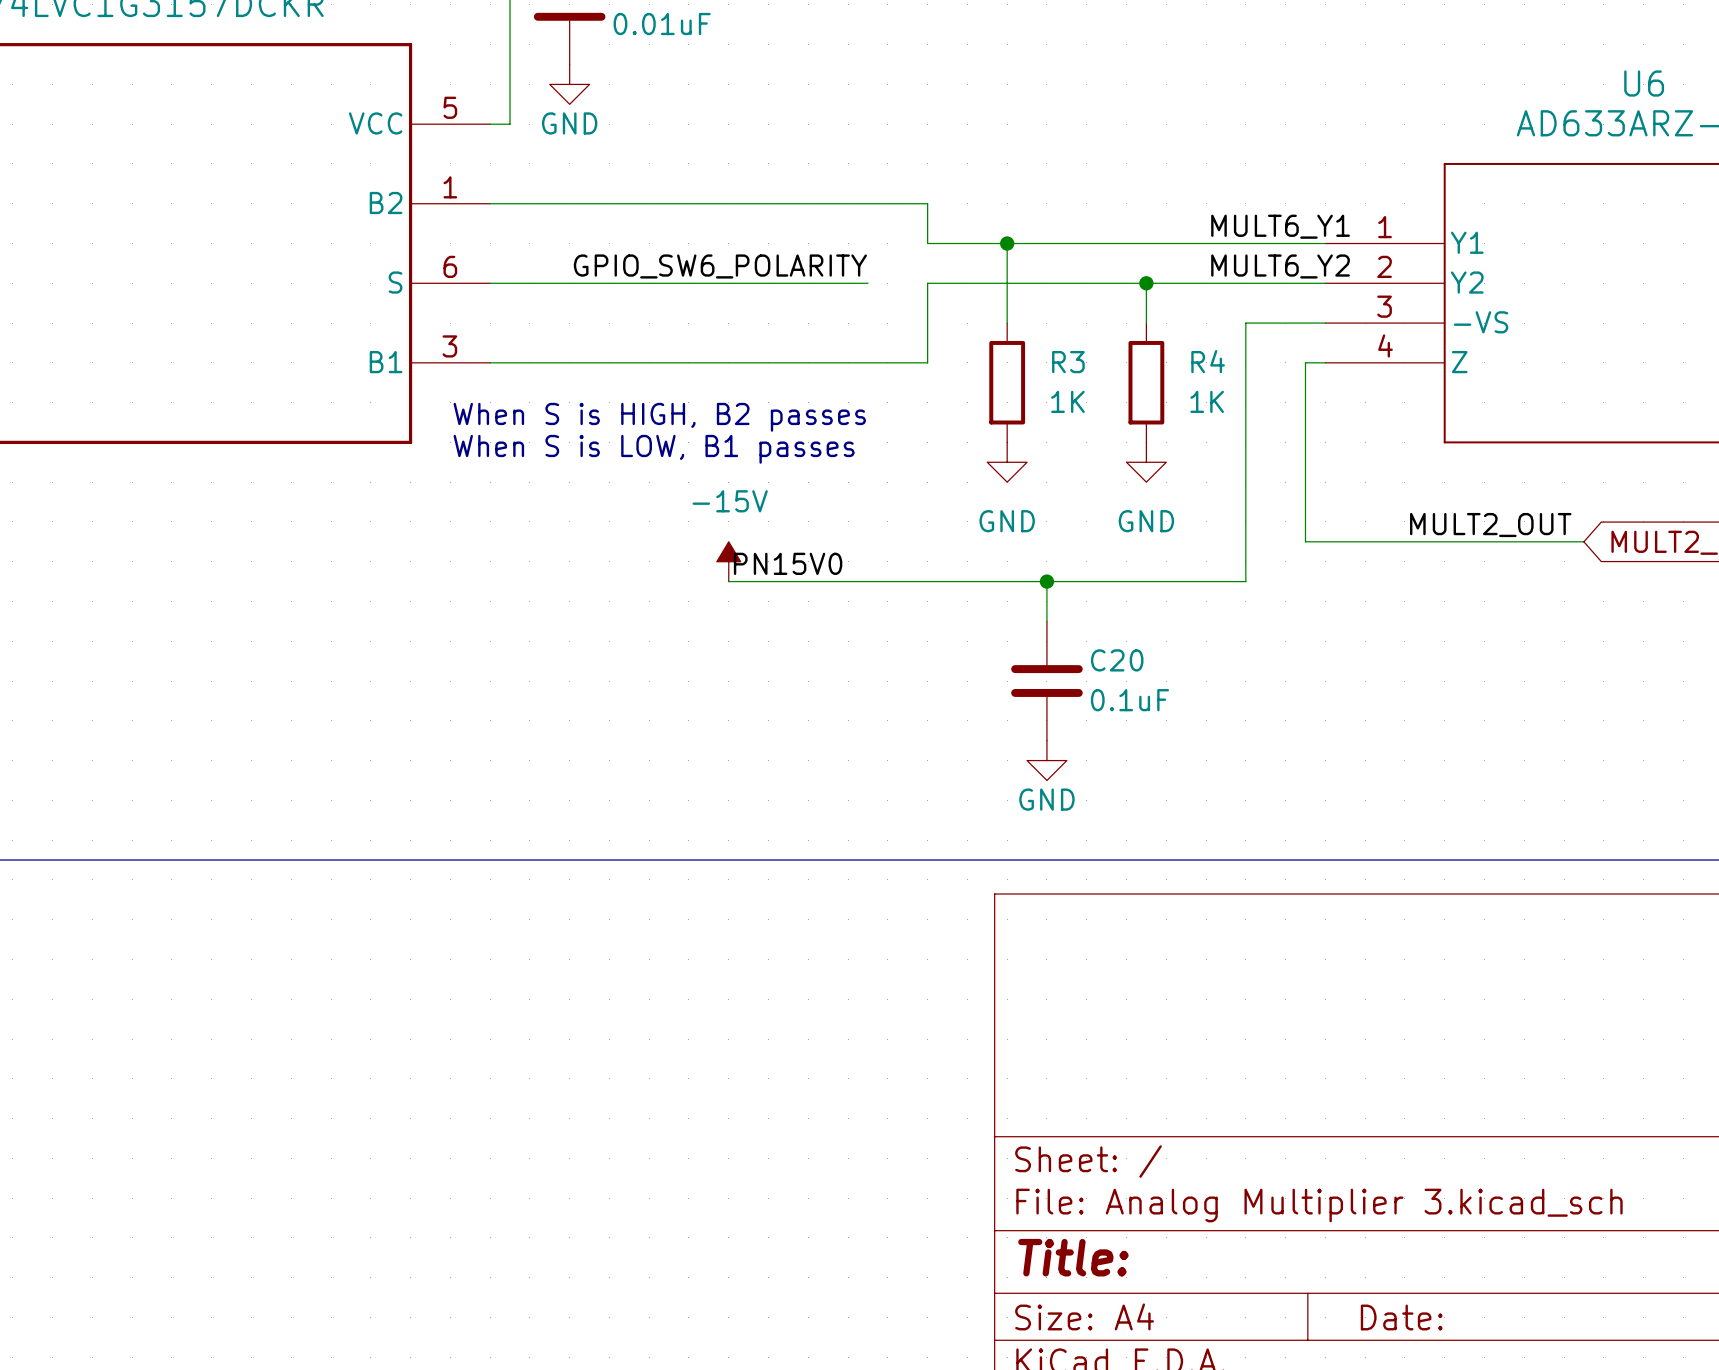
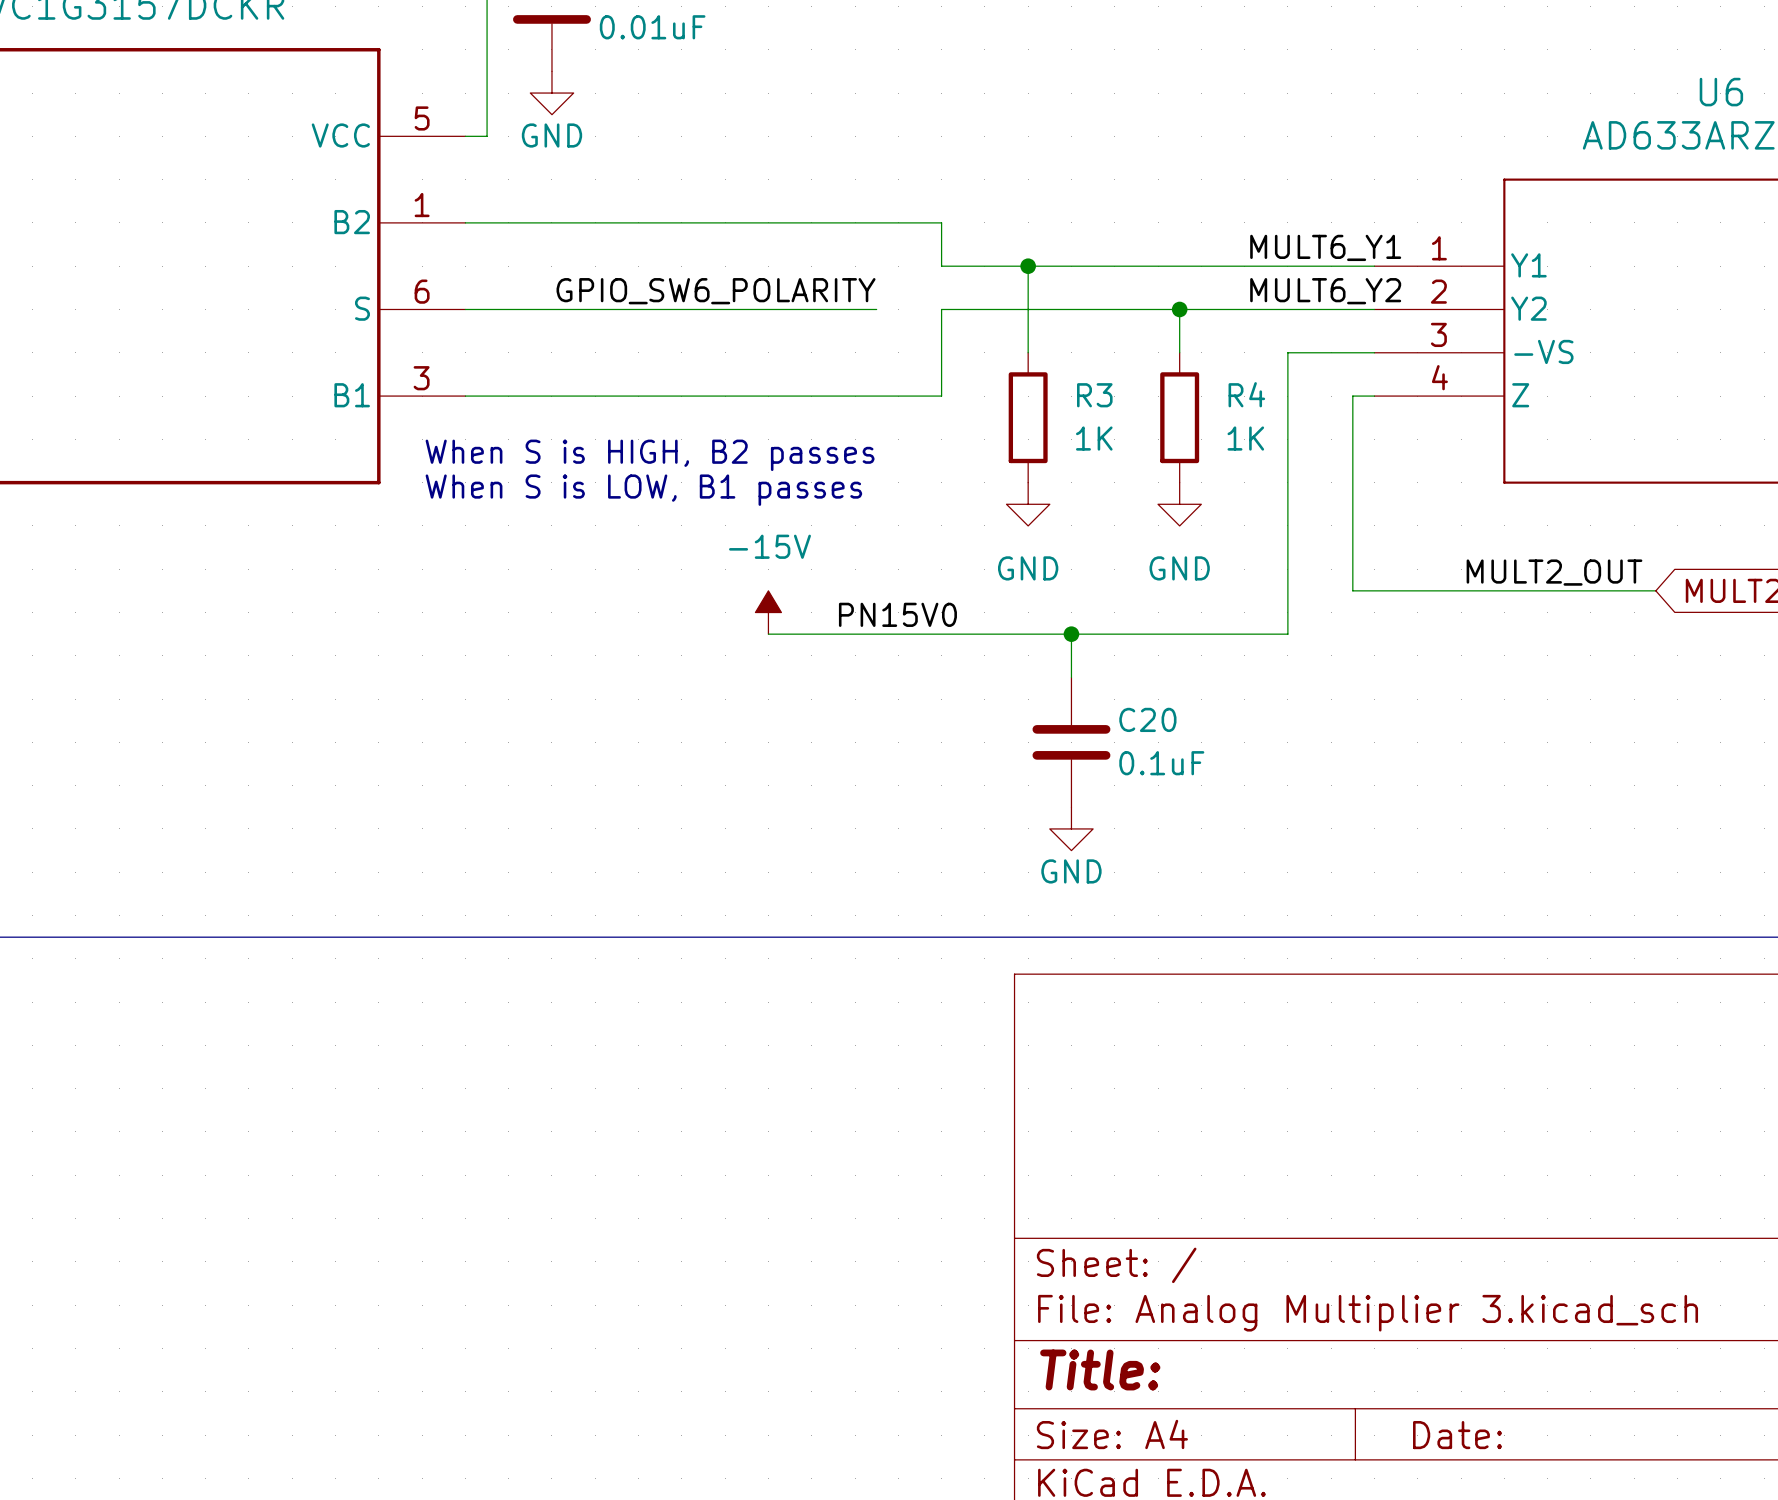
power symbol position: -15V (728, 561) -> -15V (768, 612)
label position: PN15V0 (788, 563) -> PN15V0 (897, 614)
wire: (728, 581) (768, 581) -> none

